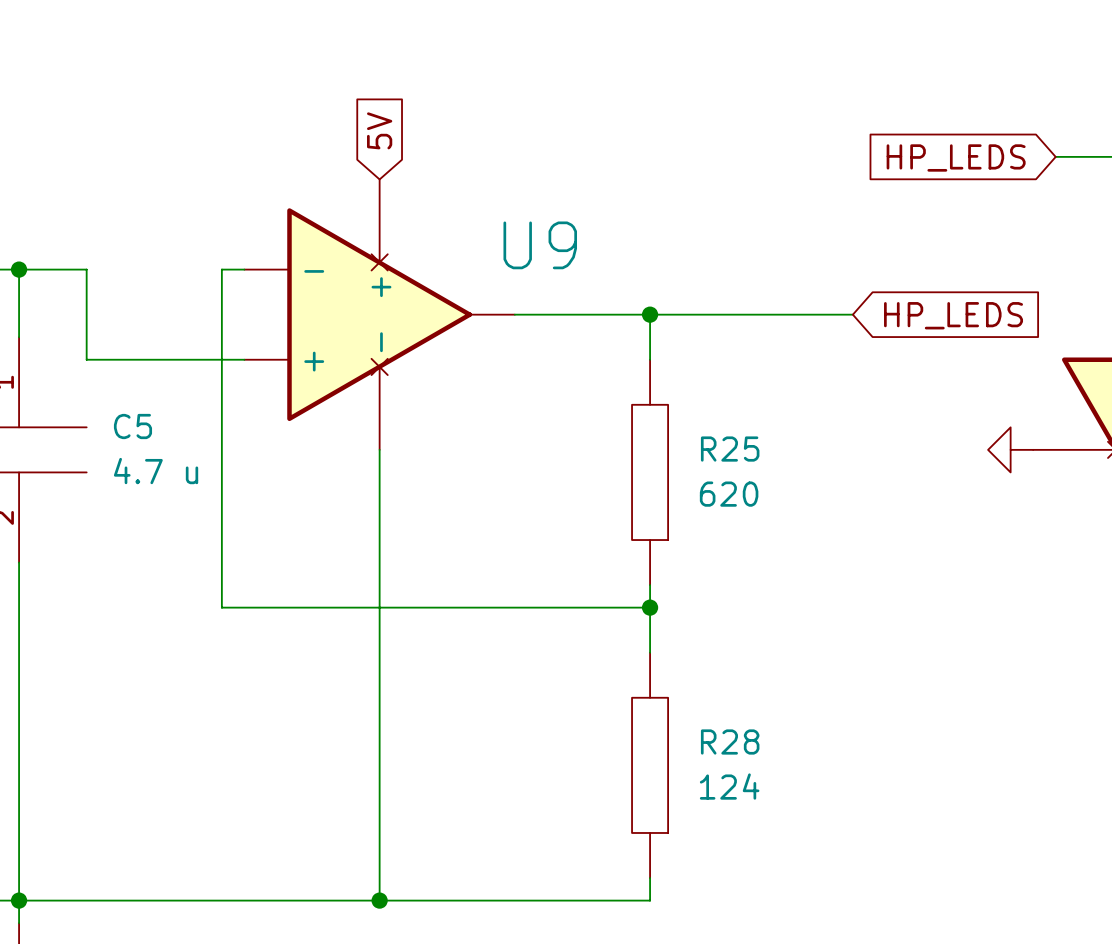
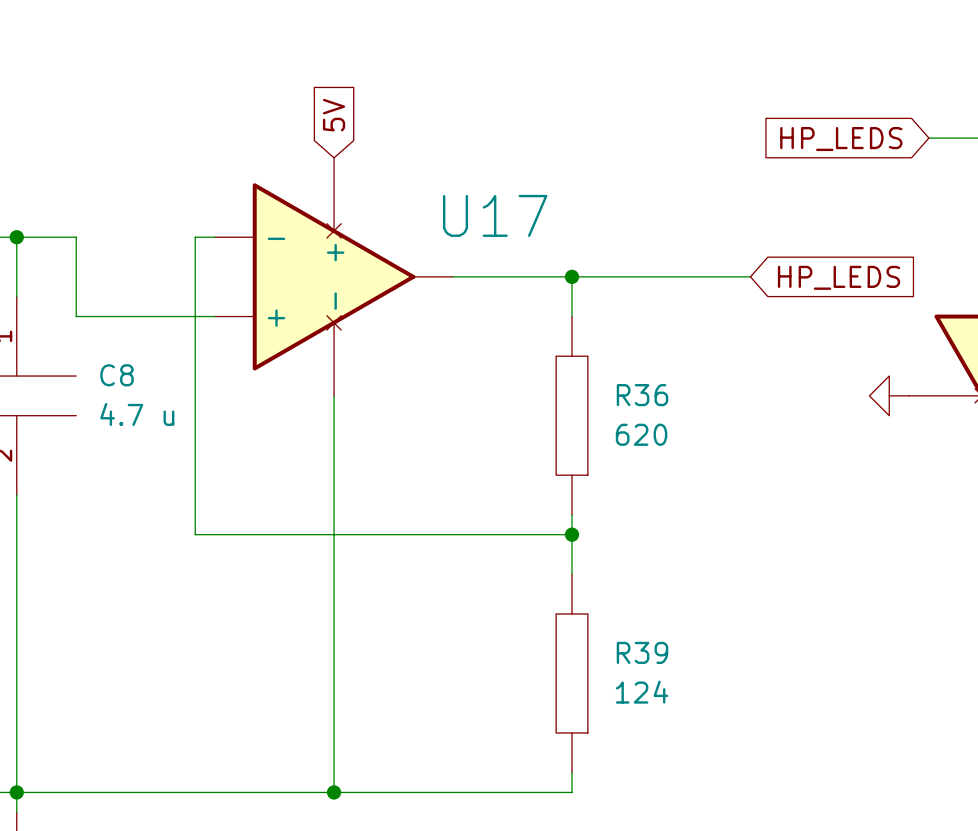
U9 name: U9 (540, 245) -> U17 (495, 215)
C5 name: C5 (132, 426) -> C8 (117, 375)
R25 name: R25 (730, 449) -> R36 (642, 395)
R28 name: R28 (730, 742) -> R39 (642, 652)

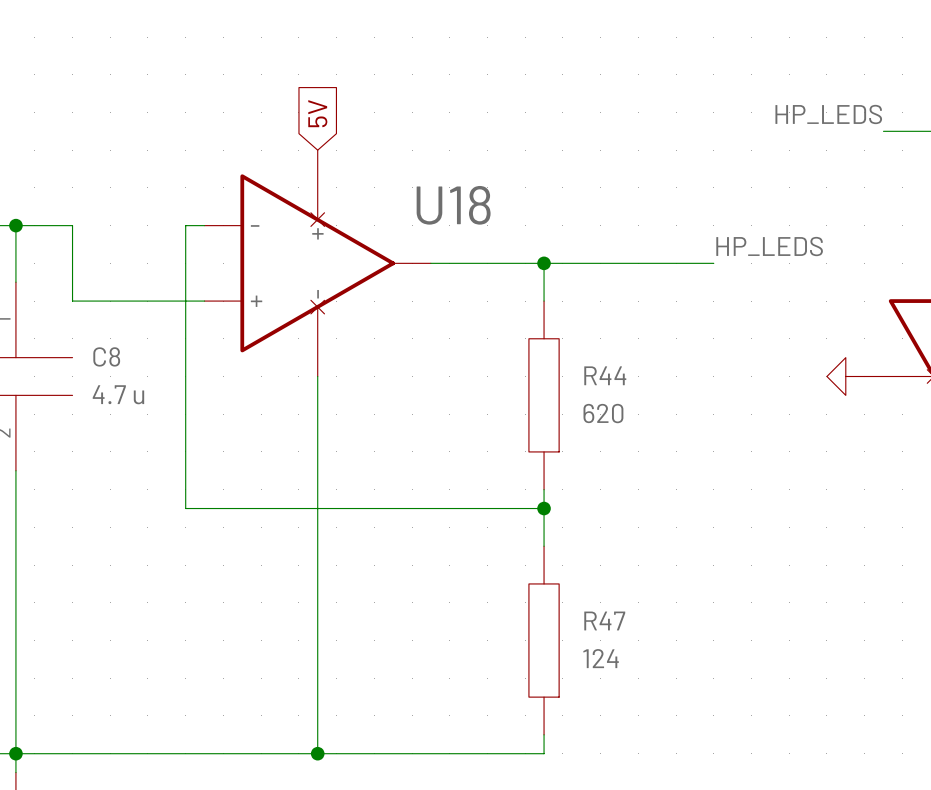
label: none -> HP_LEDS (828, 114)
global label: HP_LEDS (841, 139) -> none
U17 name: U17 (495, 215) -> U18 (453, 205)
label: none -> HP_LEDS (769, 246)
global label: HP_LEDS (839, 277) -> none
R36 name: R36 (642, 395) -> R44 (605, 375)
R39 name: R39 (642, 652) -> R47 (604, 620)

